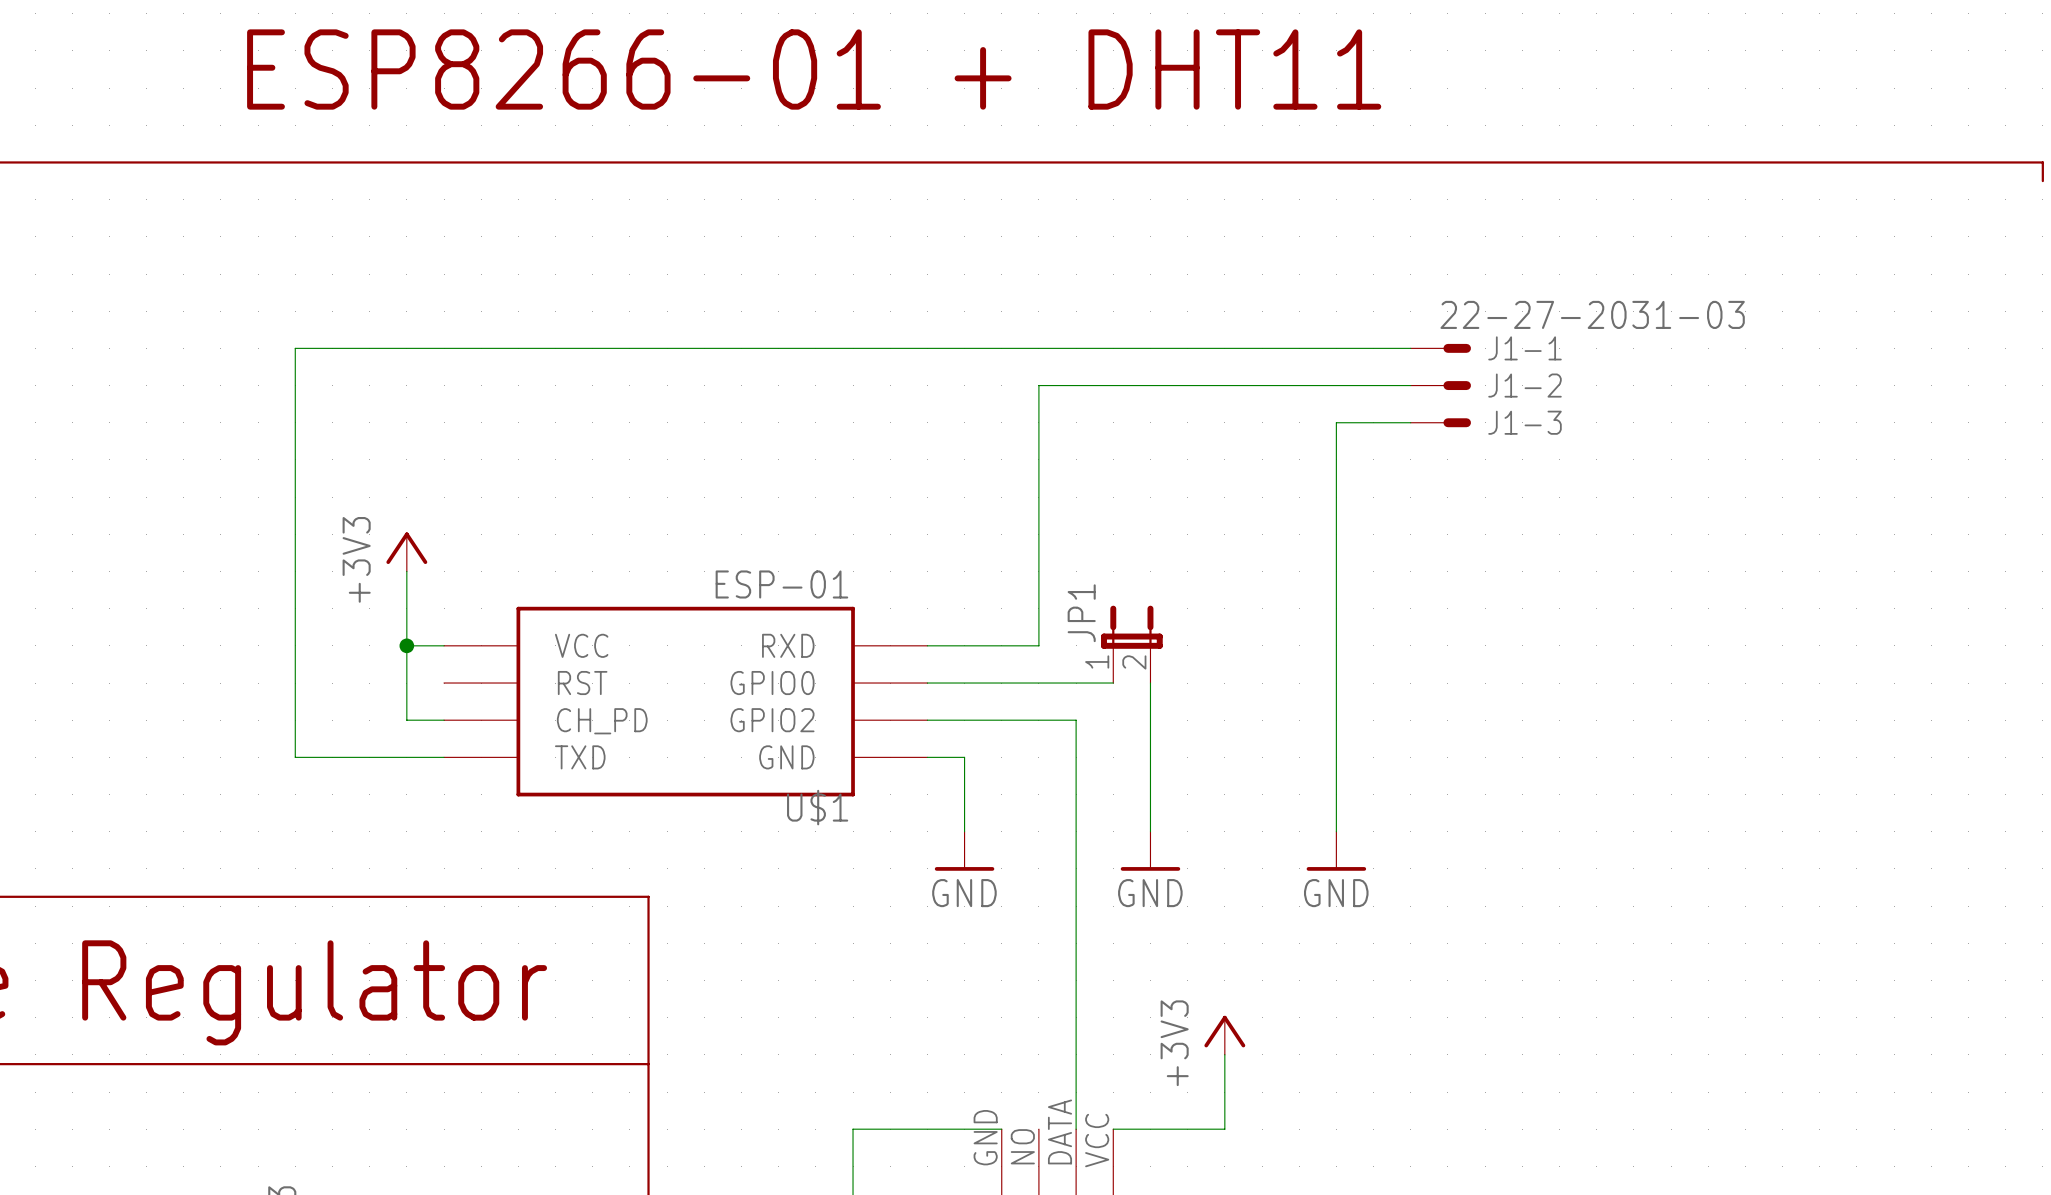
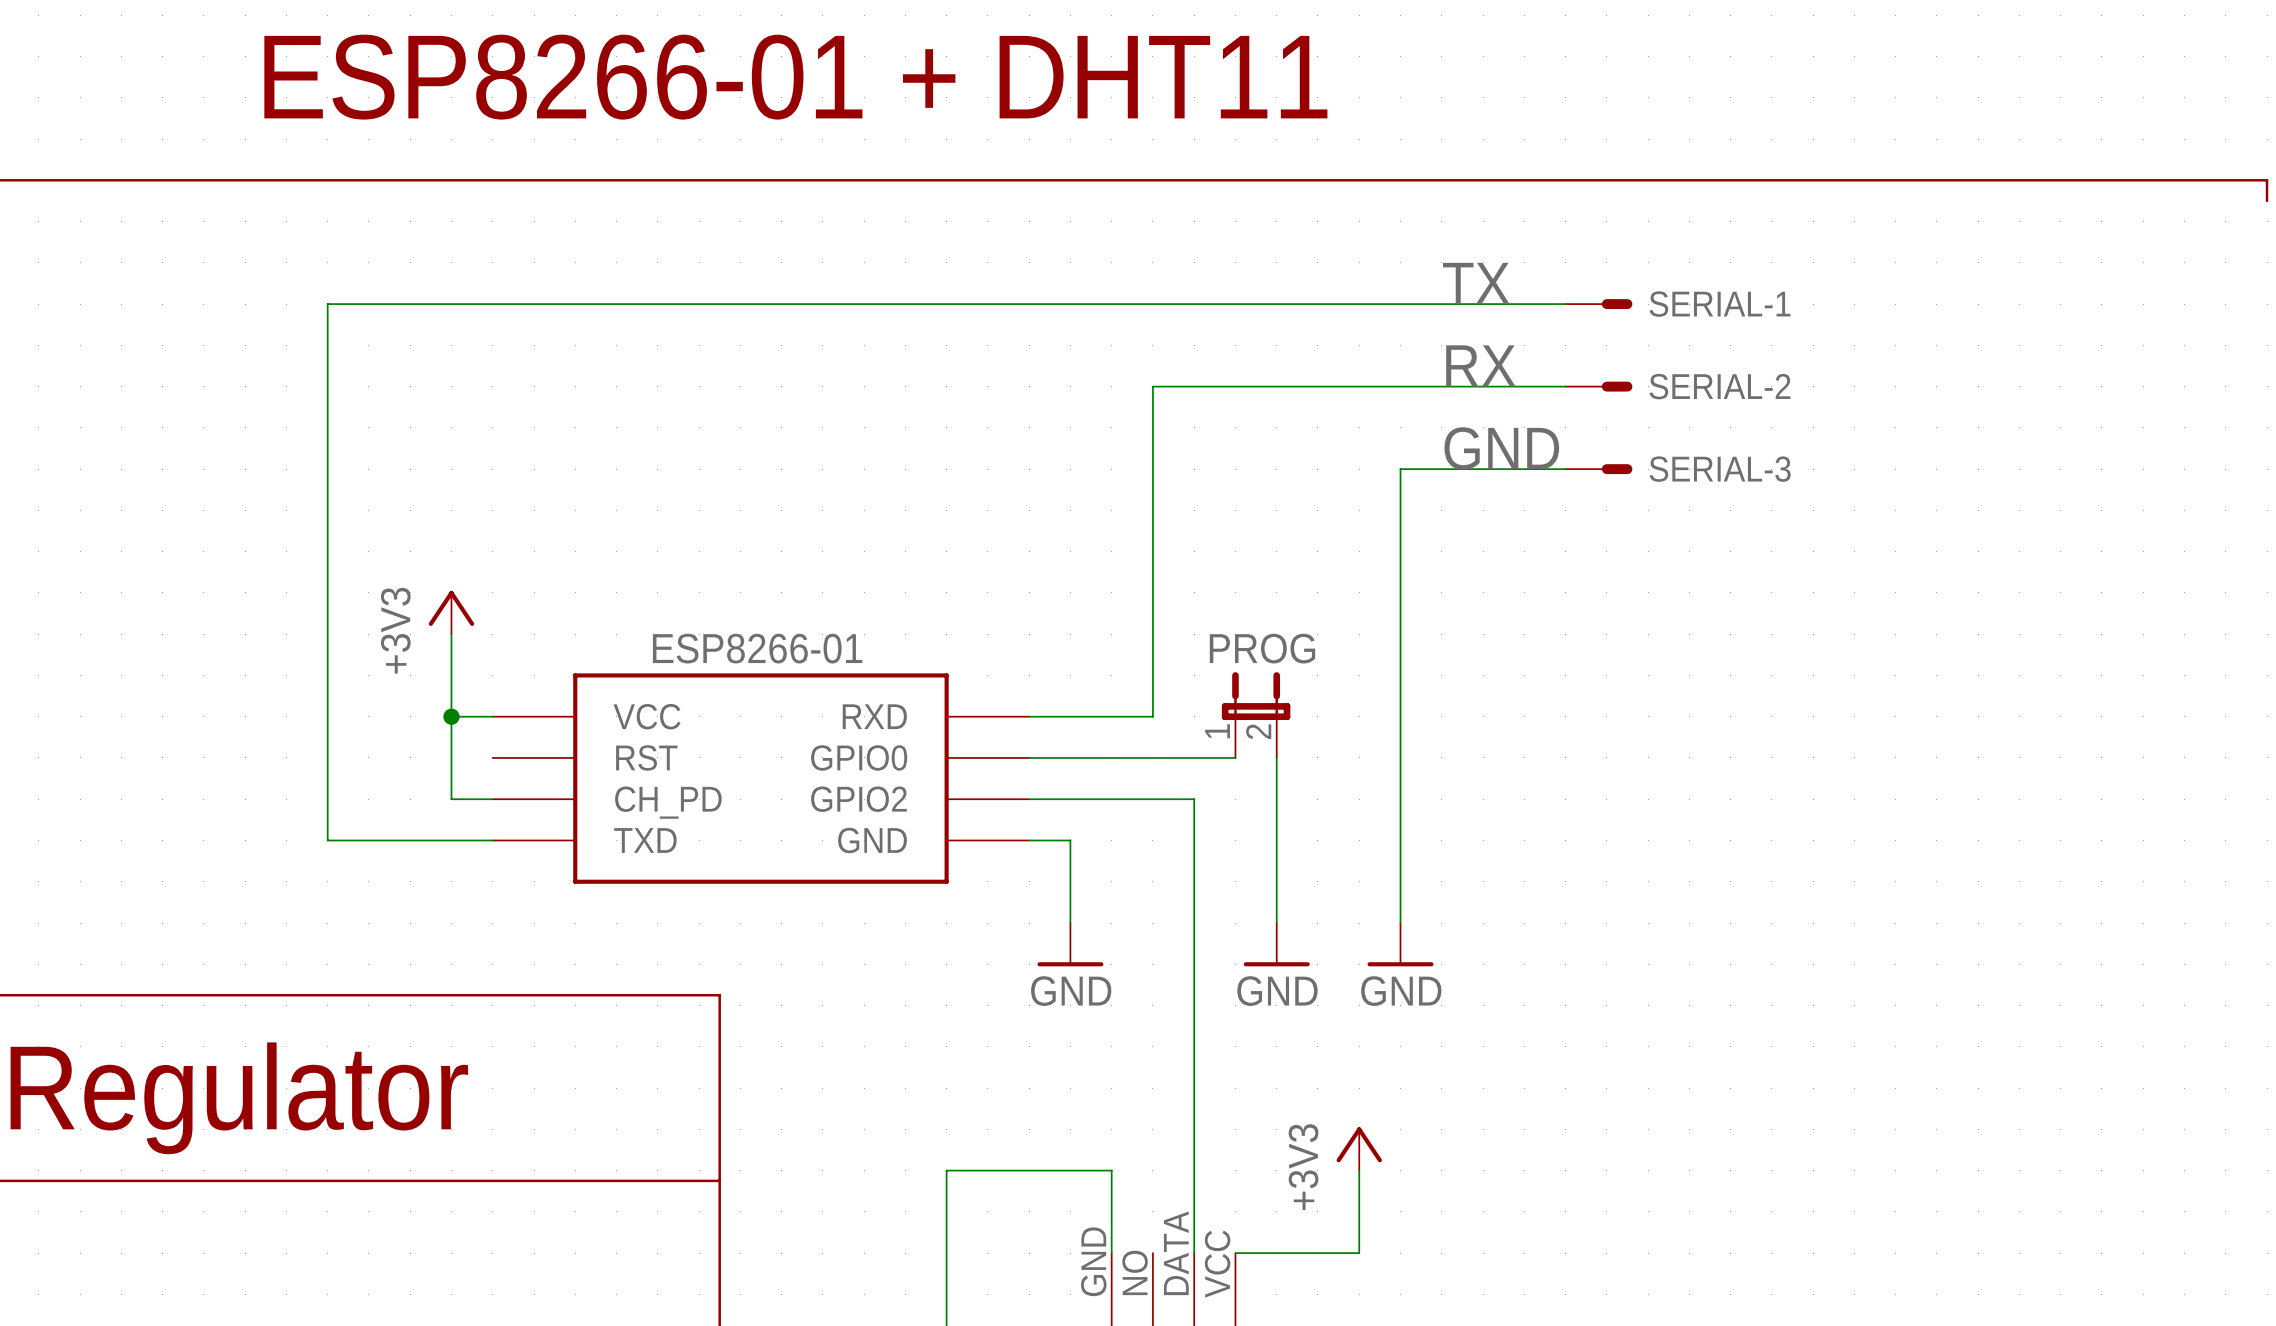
label: none -> TX (1476, 283)
SERIAL-1: none -> (1598, 304)
J1-1 value: 22-27-2031-03 (1592, 314) -> none
label: none -> RX (1480, 365)
wire: (295, 348) (1038, 348) -> (327, 386) (327, 304) (1565, 304)
J1-1 name: J1-1 (1525, 348) -> SERIAL-2 (1720, 386)
wire: (1038, 385) (1410, 385) -> (1152, 427) (1152, 386)
J1-2: (1440, 385) -> none
label: none -> GND (1501, 448)
wire: (1336, 422) (1336, 831) -> (1483, 469) (1400, 469) (1400, 923)
J1-3 name: J1-3 (1525, 422) -> SERIAL-3 (1720, 469)
U$1 value: ESP-01 (781, 584) -> none
JP1 name: JP1 (1081, 613) -> PROG (1262, 648)
U$1 name: U$1 (817, 807) -> ESP8266-01 (757, 648)
power symbol position: GND (1336, 851) -> GND (1400, 944)
wire: (853, 1129) (1001, 1129) -> (946, 1253) (946, 1170) (1111, 1170) (1111, 1253)

